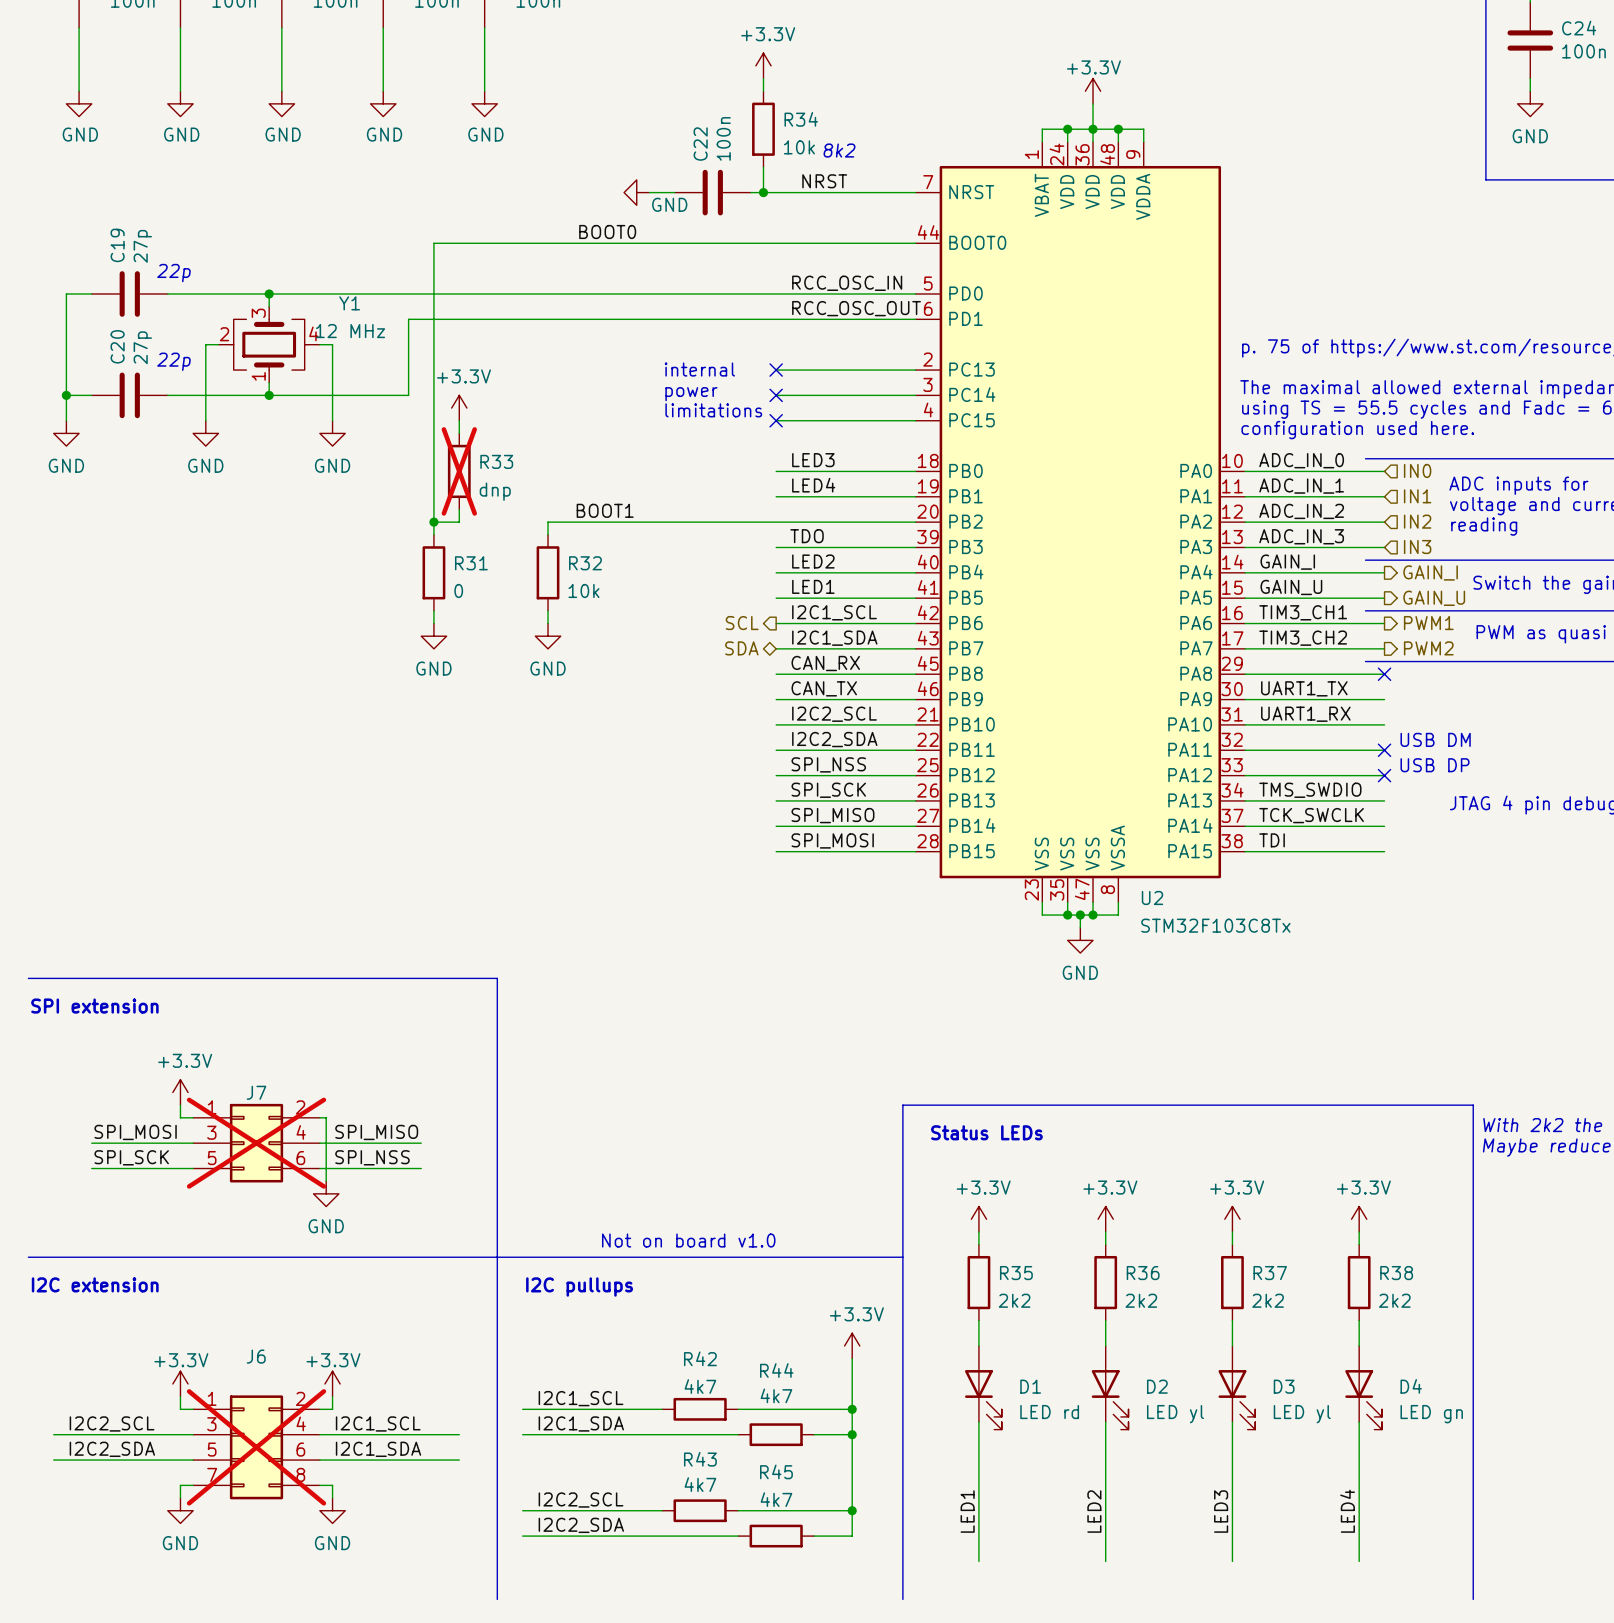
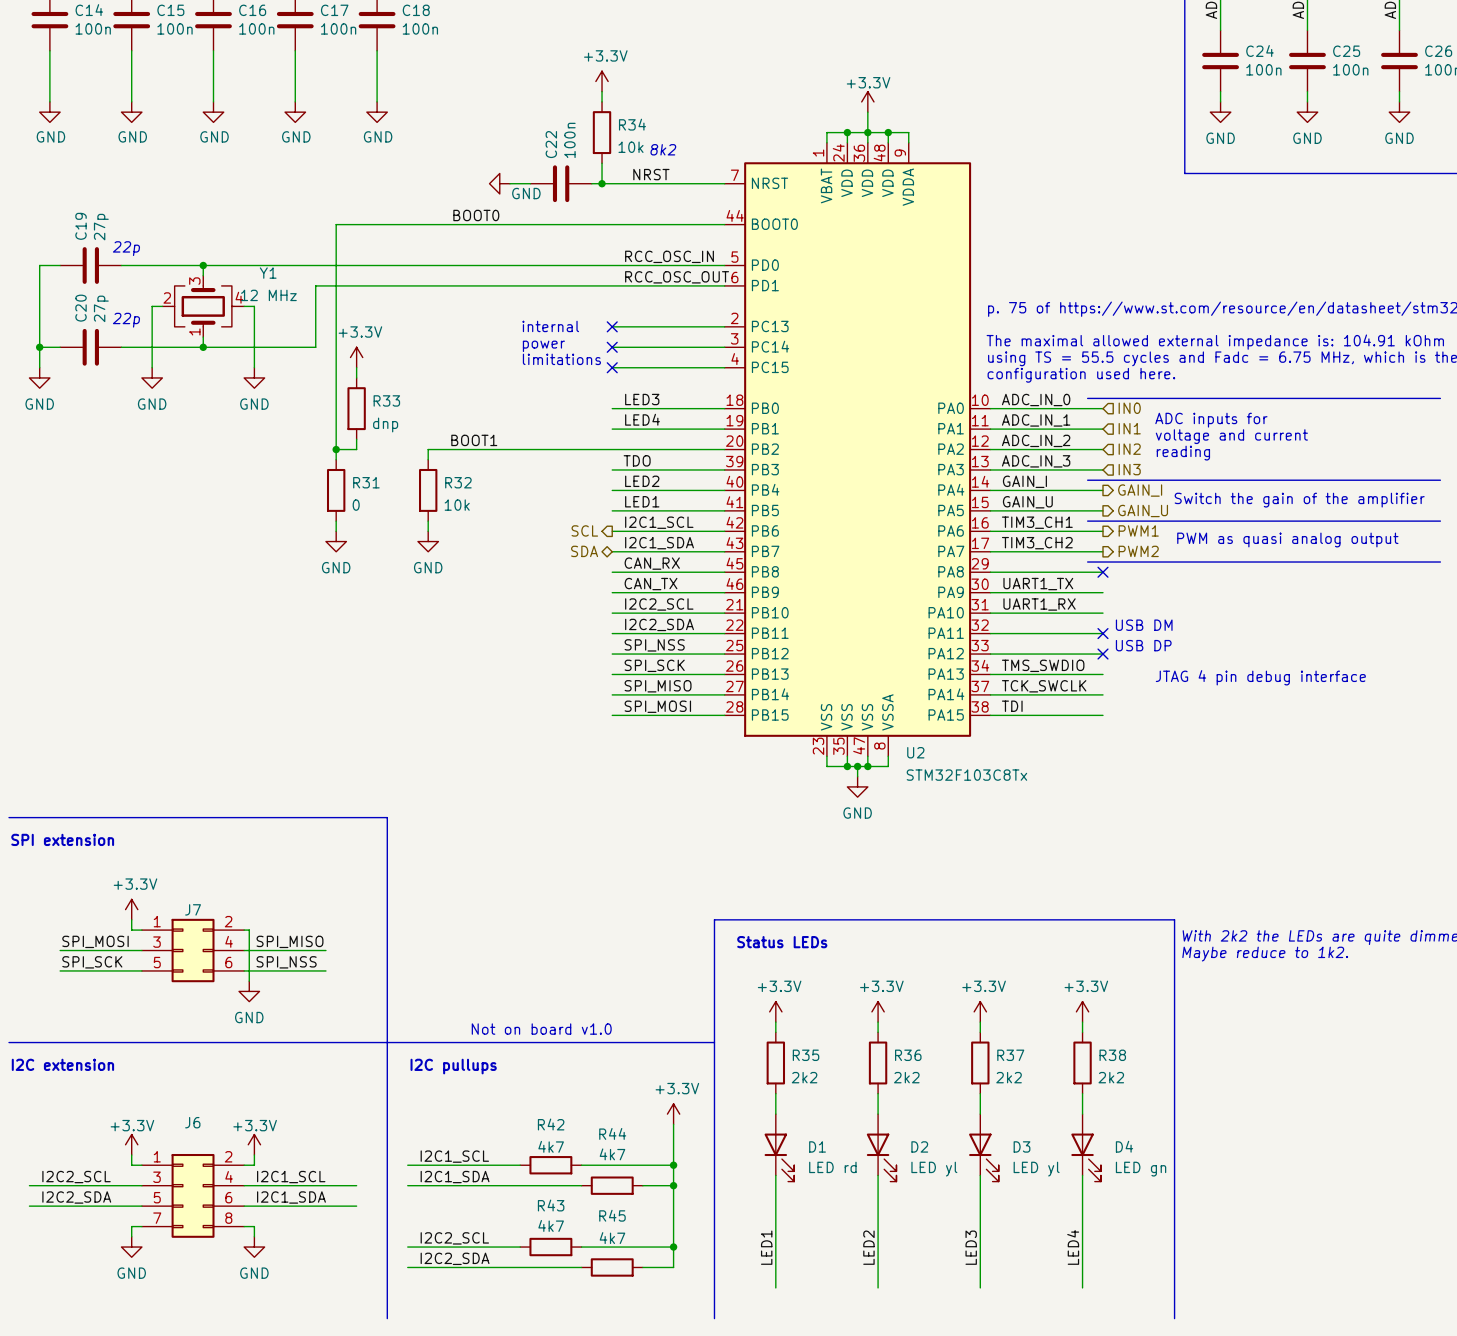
R33 do-not-place cross: (459, 471) -> none
J7 do-not-place cross: (256, 1143) -> none
J6 do-not-place cross: (256, 1447) -> none

